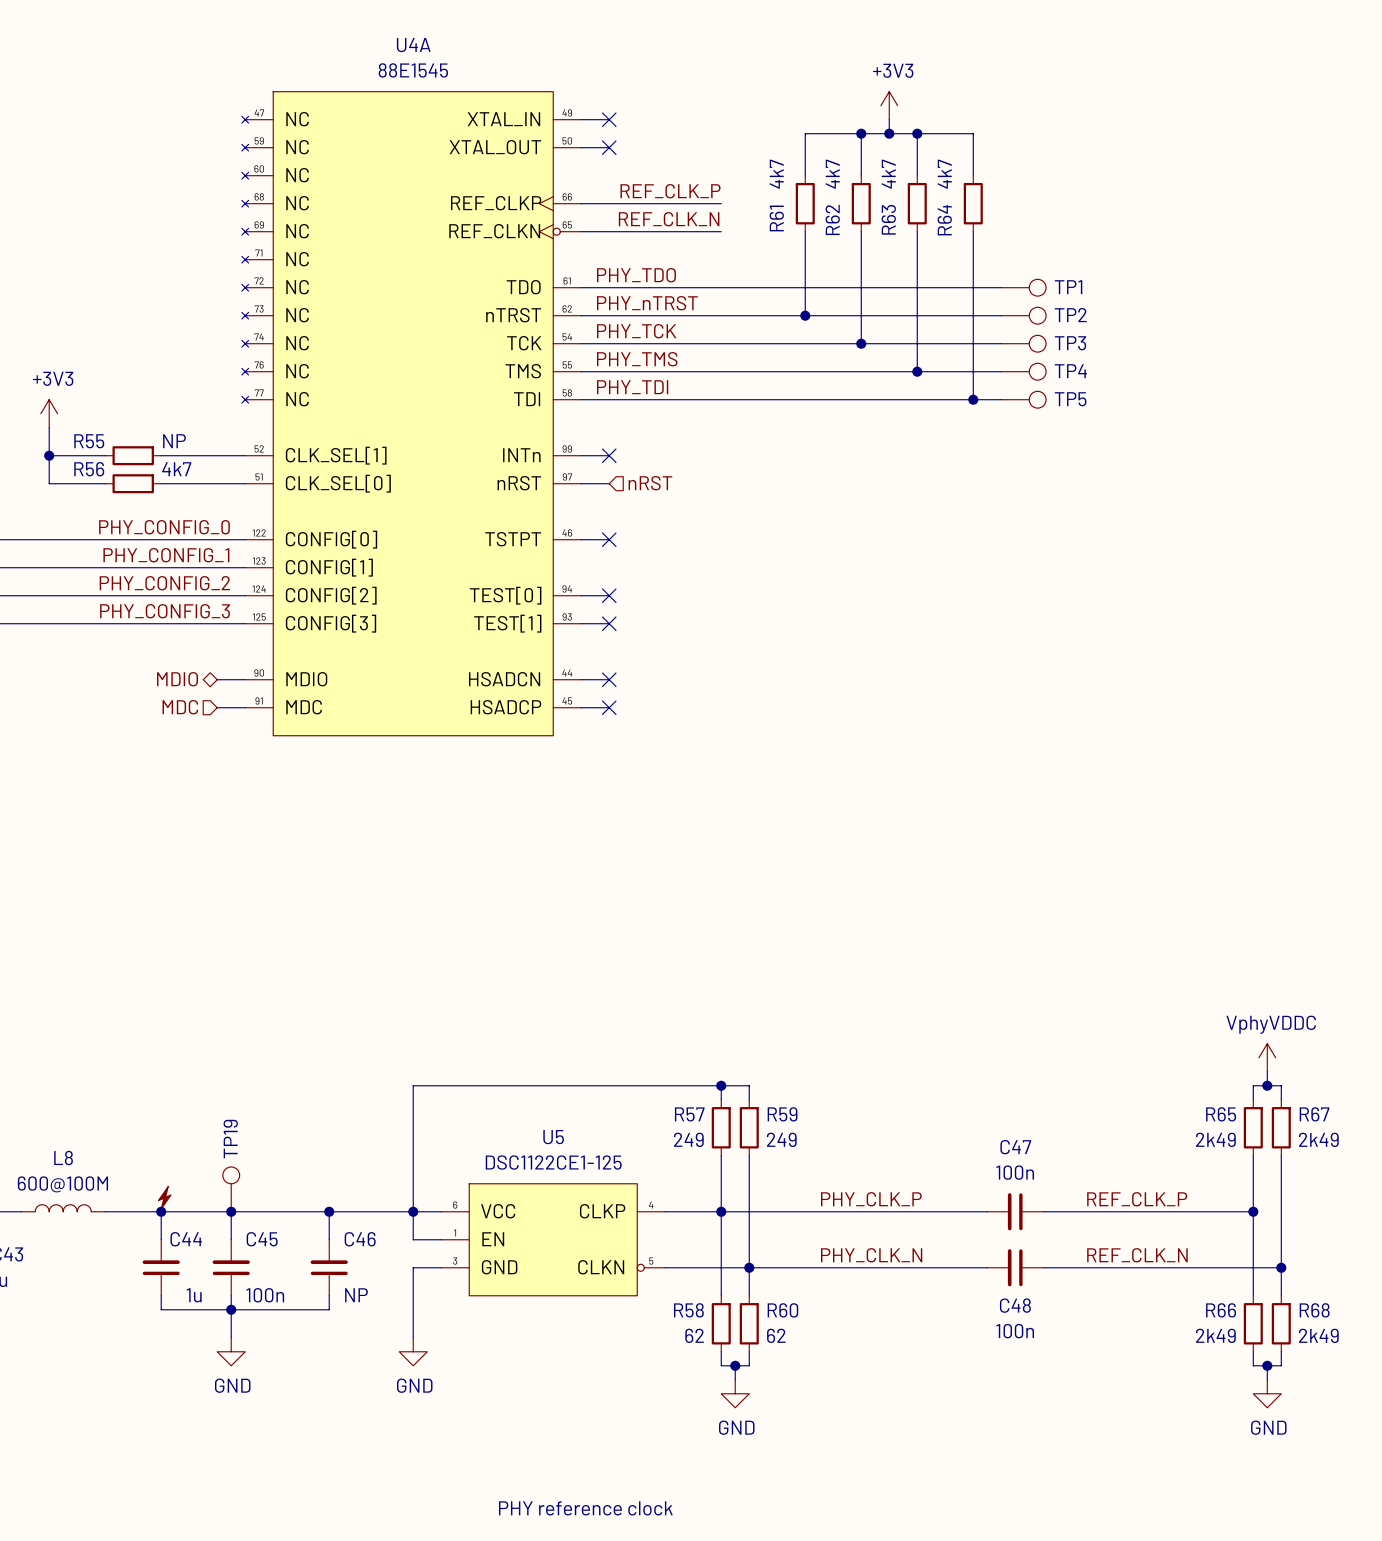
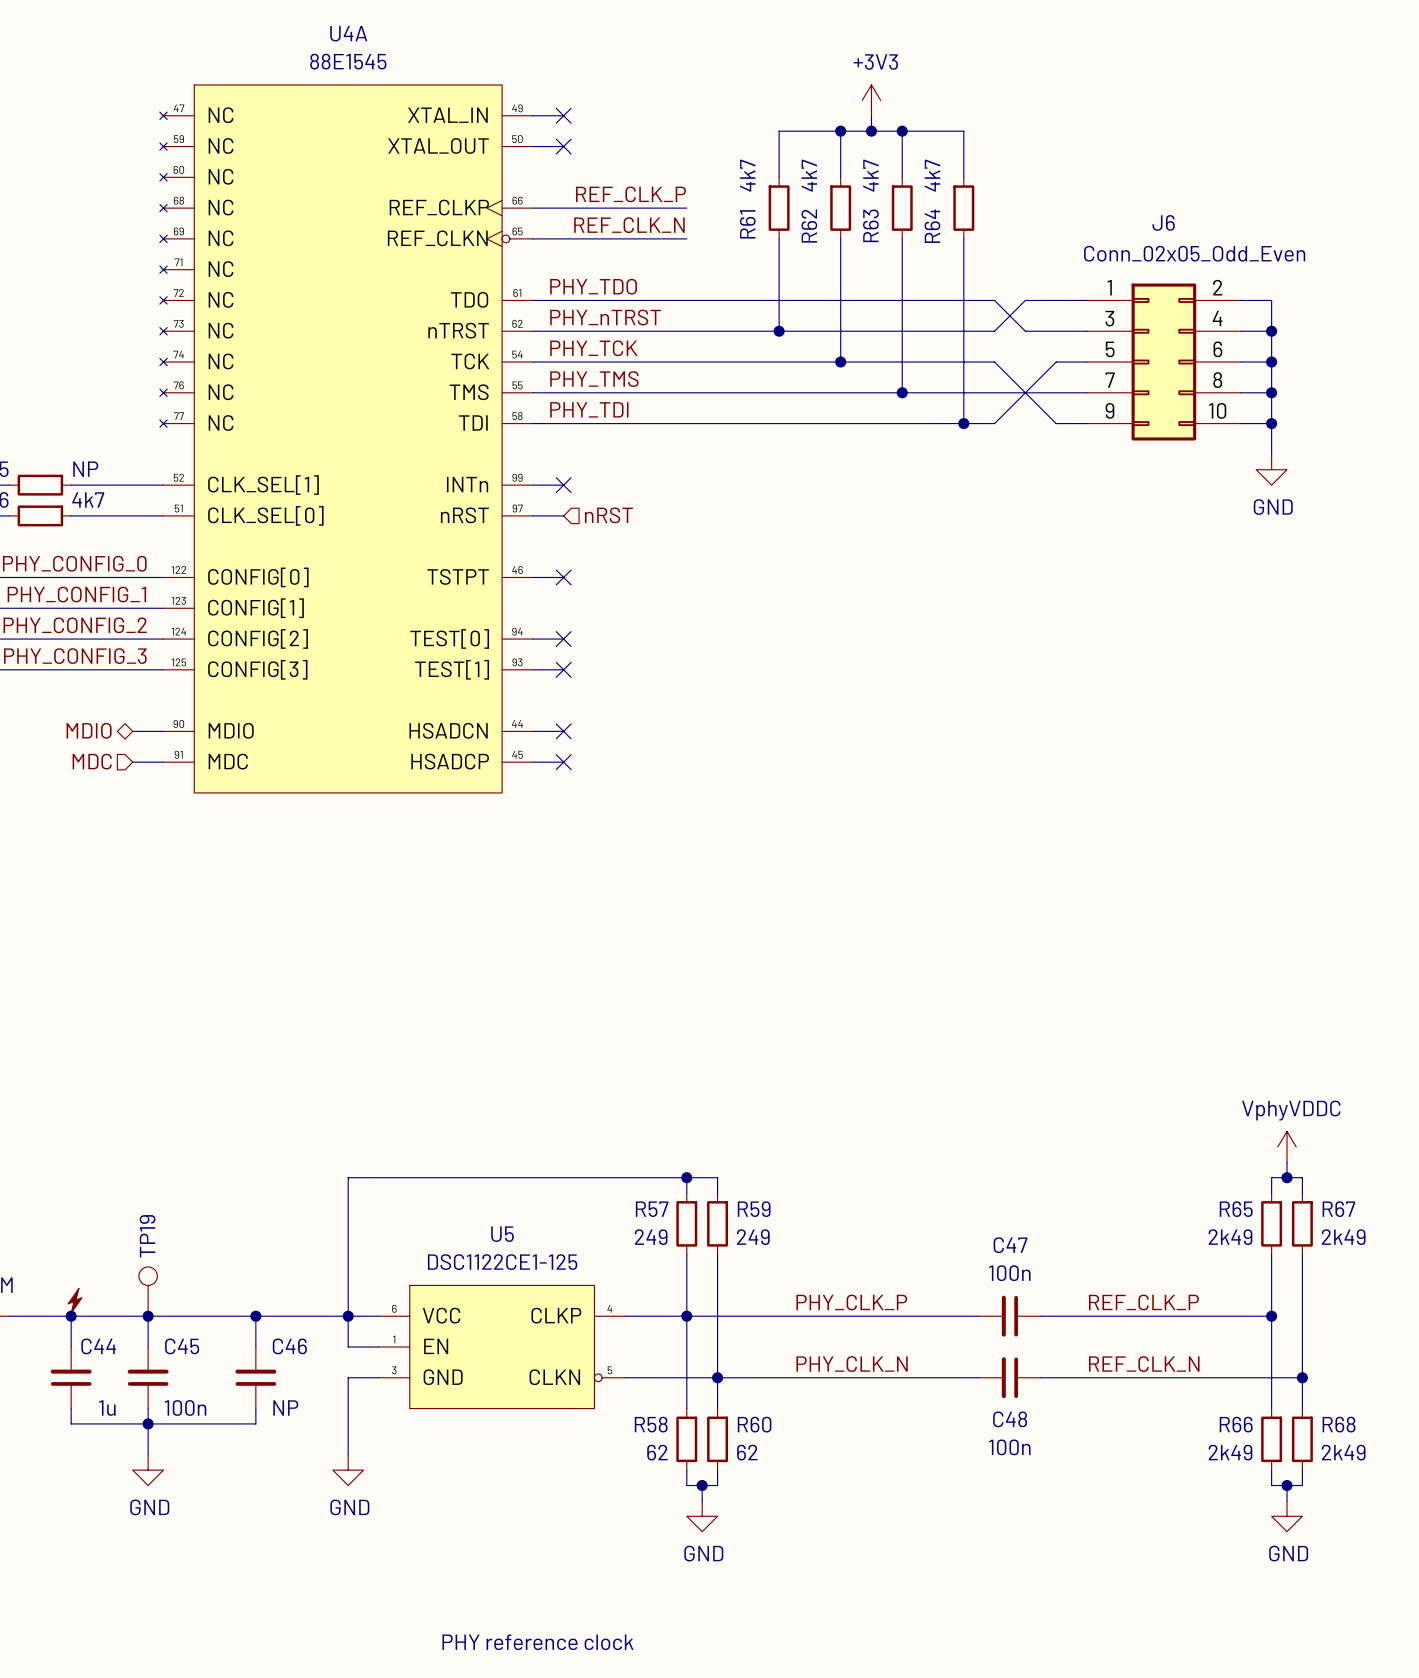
wire: none -> (994, 300) (1025, 331) (1086, 331)
TP1: (1023, 287) -> none
wire: none -> (1086, 300) (1025, 300) (994, 331)
wire: none -> (1240, 300) (1271, 300) (1271, 454)
TP2: (1023, 315) -> none
wire: none -> (1240, 331) (1271, 331)
junction: none -> (1271, 331)
wire: none -> (994, 362) (1056, 423) (1086, 423)
TP3: (1023, 343) -> none
wire: none -> (1086, 362) (1056, 362) (994, 423)
J6: none -> Conn_02x05_Odd_Even (1163, 362)
wire: none -> (1240, 362) (1271, 362)
junction: none -> (1271, 362)
wire: none -> (994, 392) (1086, 392)
TP4: (1023, 371) -> none
wire: none -> (1240, 392) (1271, 392)
junction: none -> (1271, 392)
TP5: (1023, 399) -> none
wire: none -> (1240, 423) (1271, 423)
junction: none -> (1271, 423)
power symbol: none -> GND (1271, 469)

